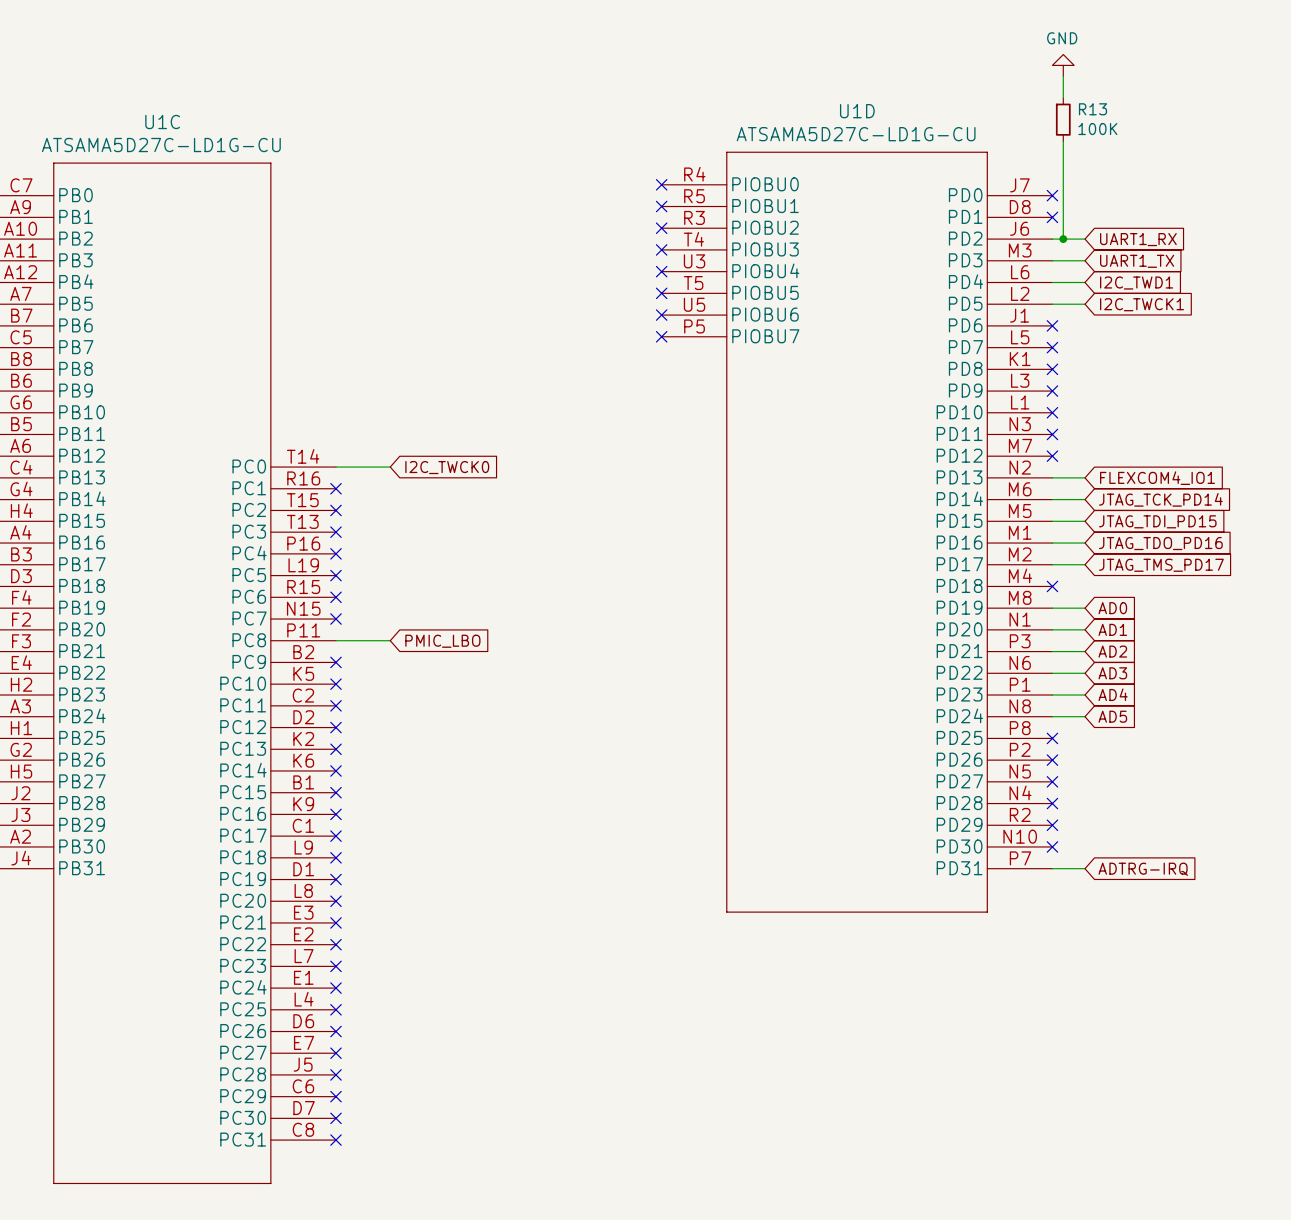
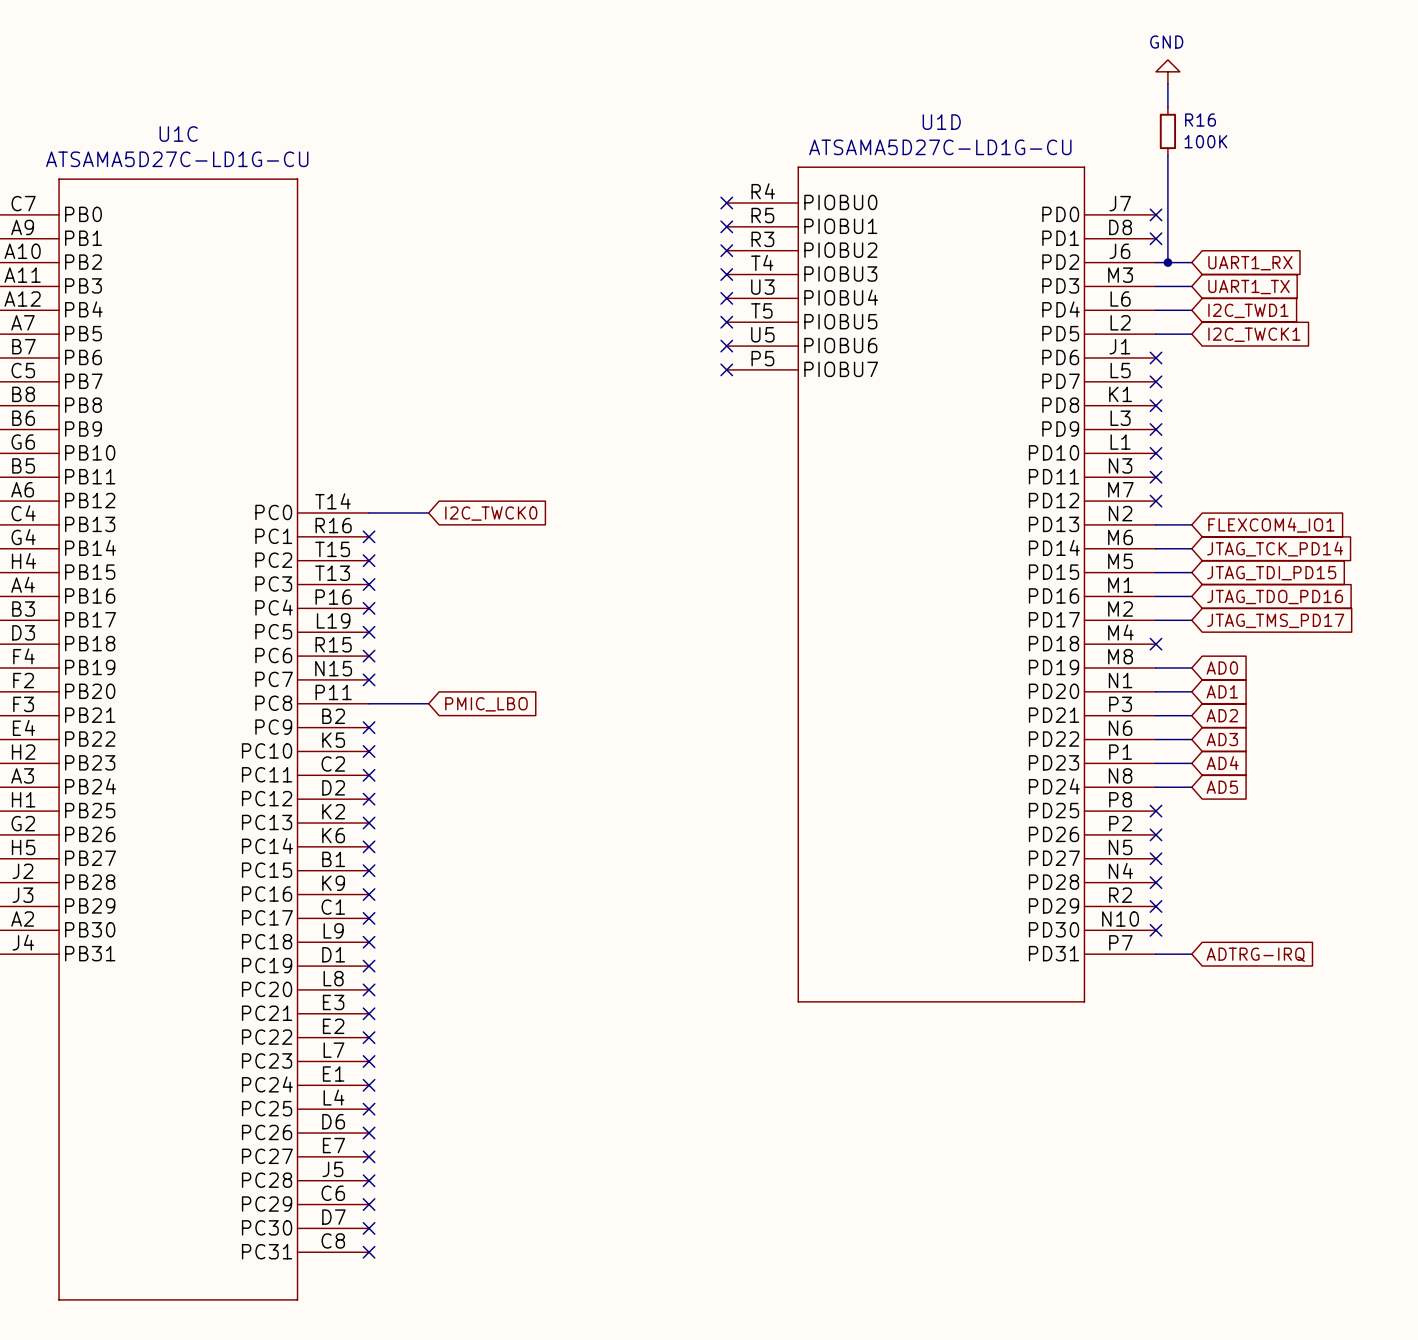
R13 name: R13 (1092, 109) -> R16 (1200, 120)

